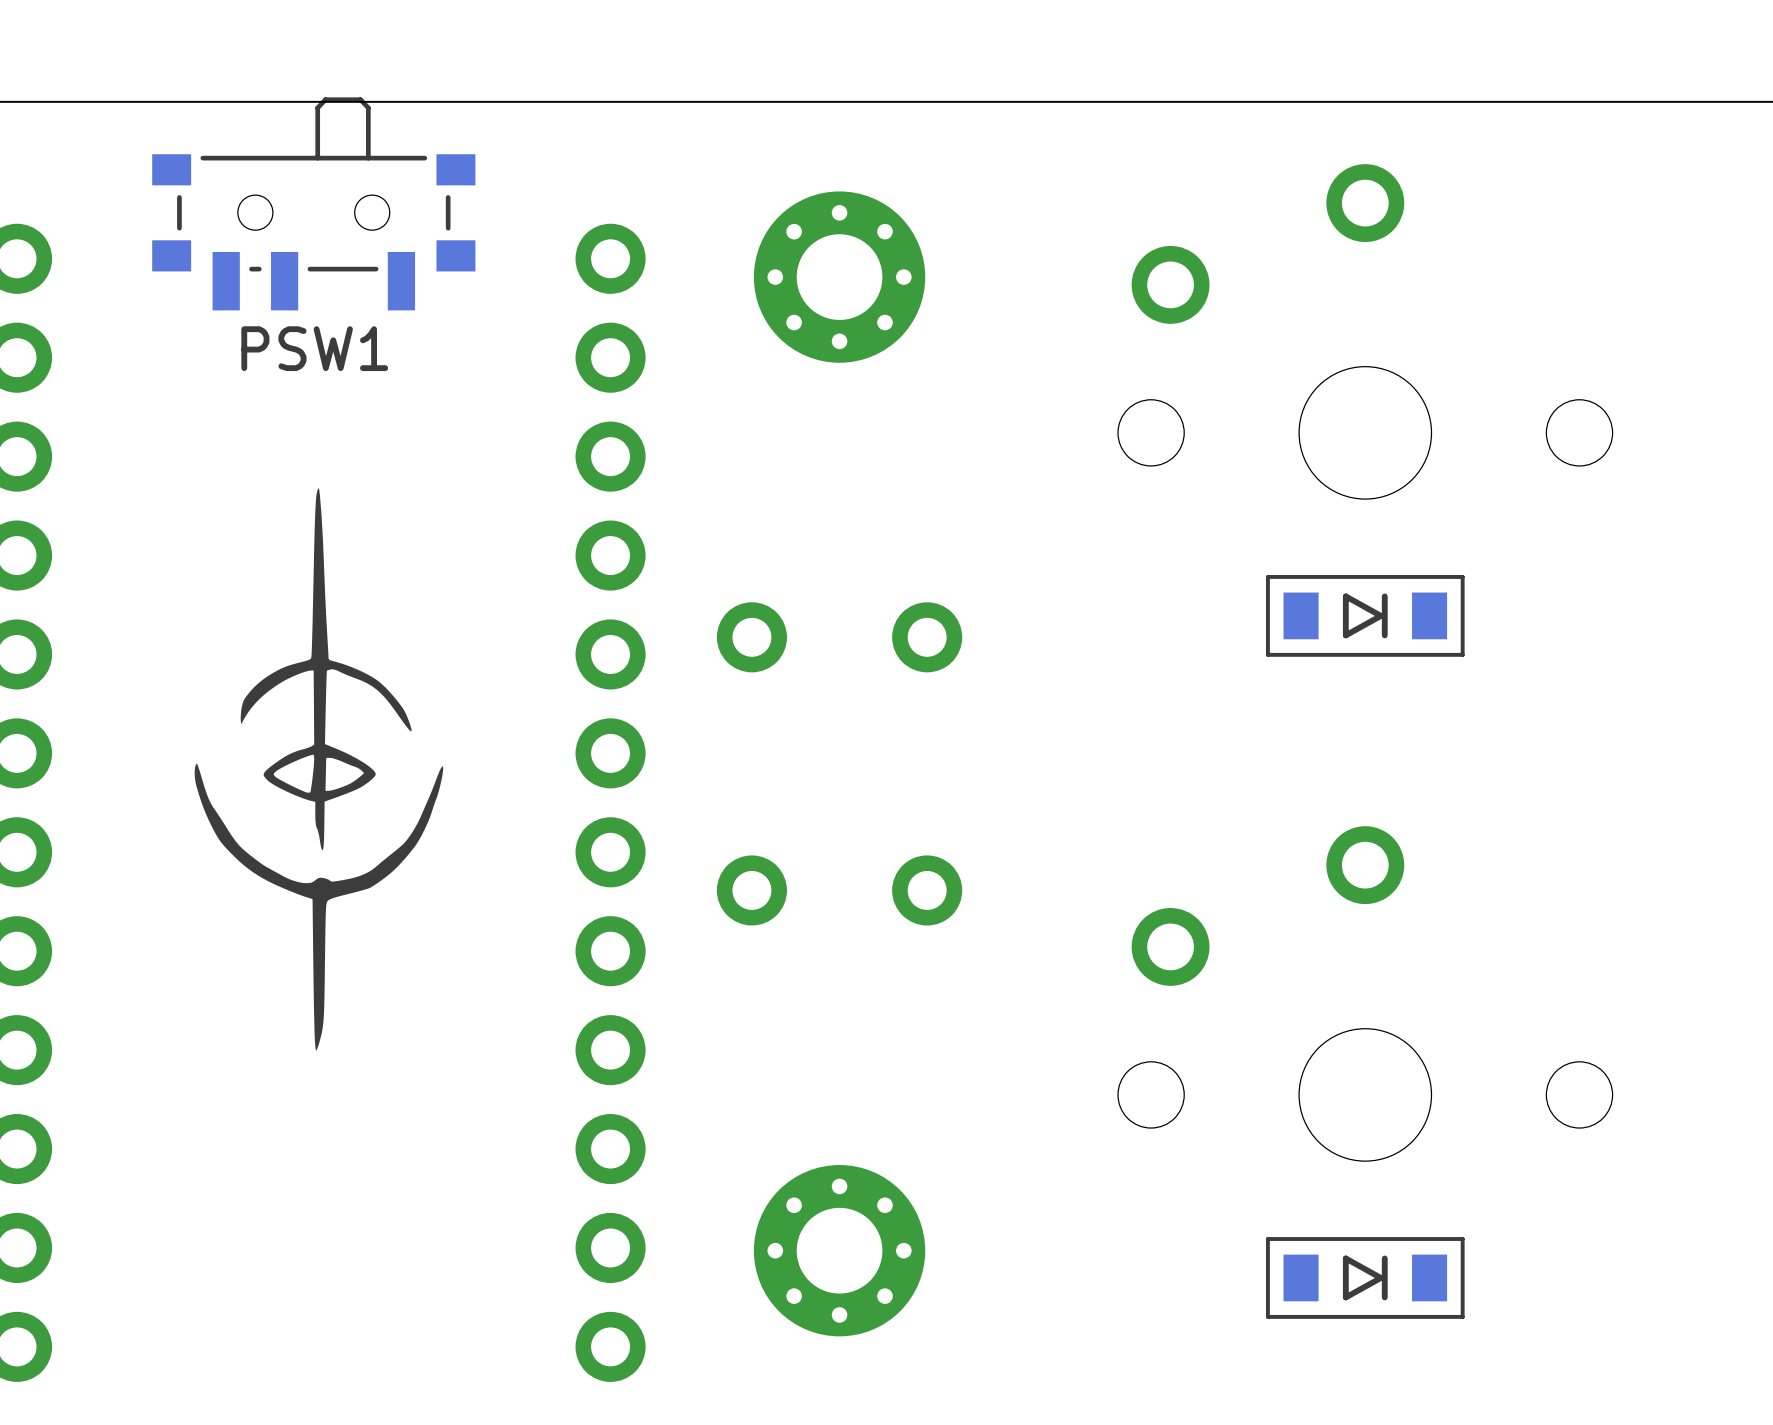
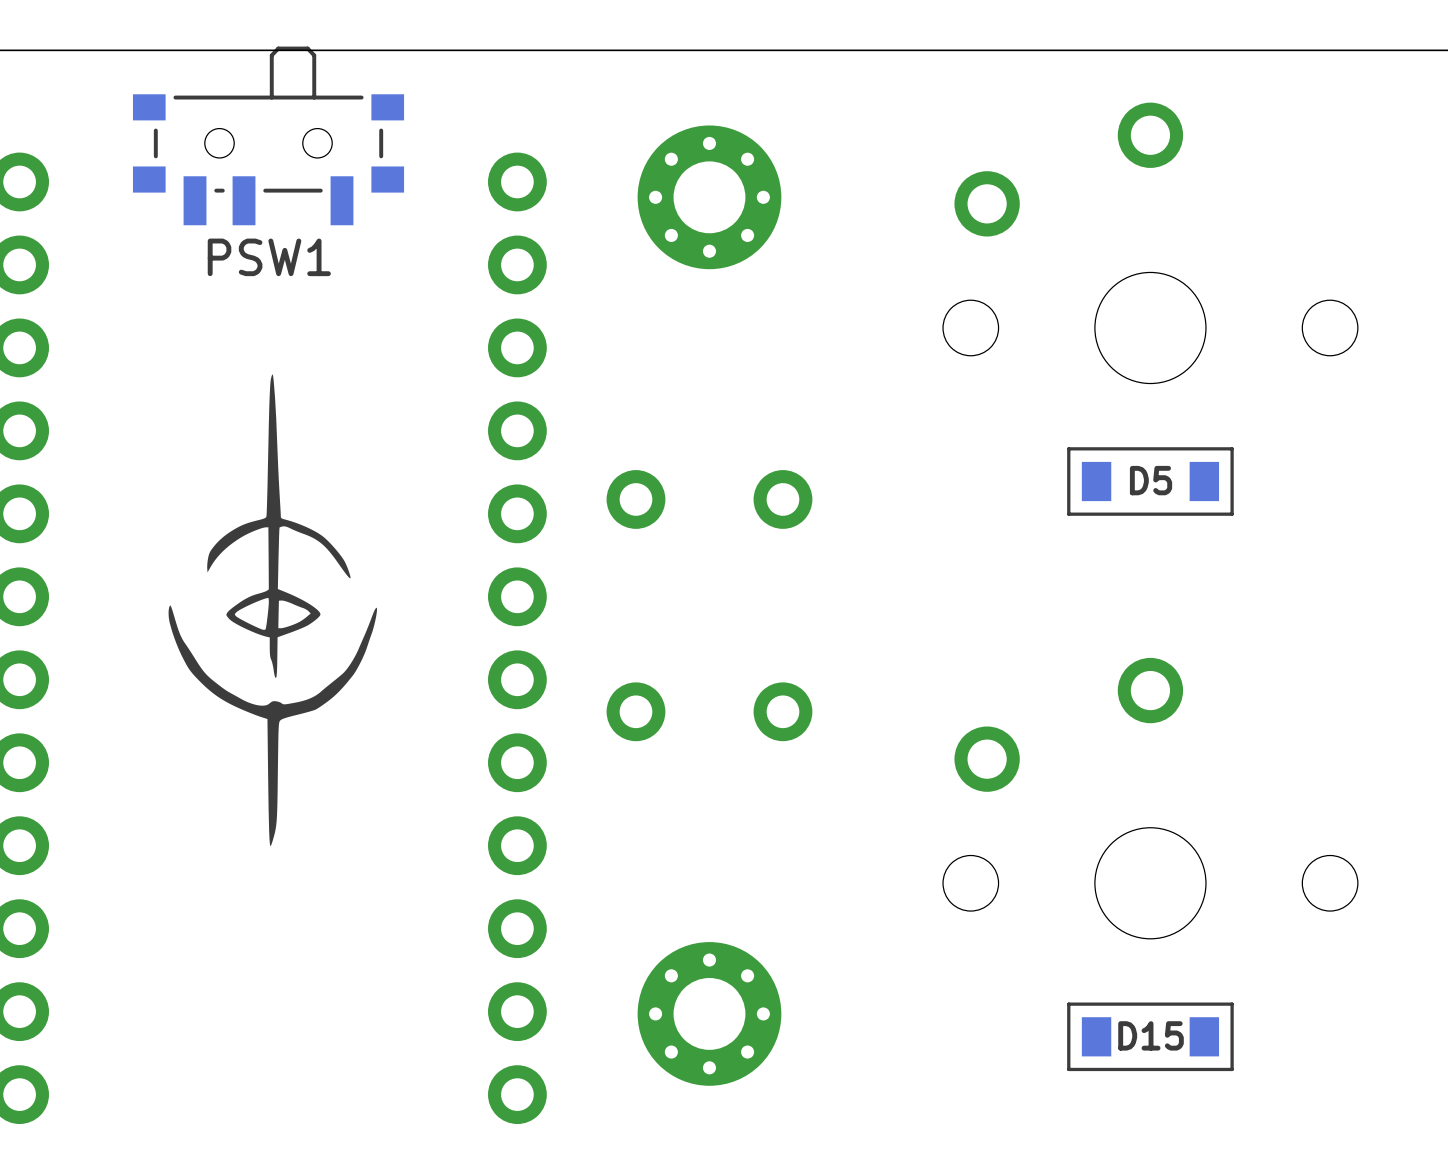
part: (1365, 615) -> none
D5: none -> (1150, 481)
part: (1365, 1277) -> none
D15: none -> (1150, 1036)

